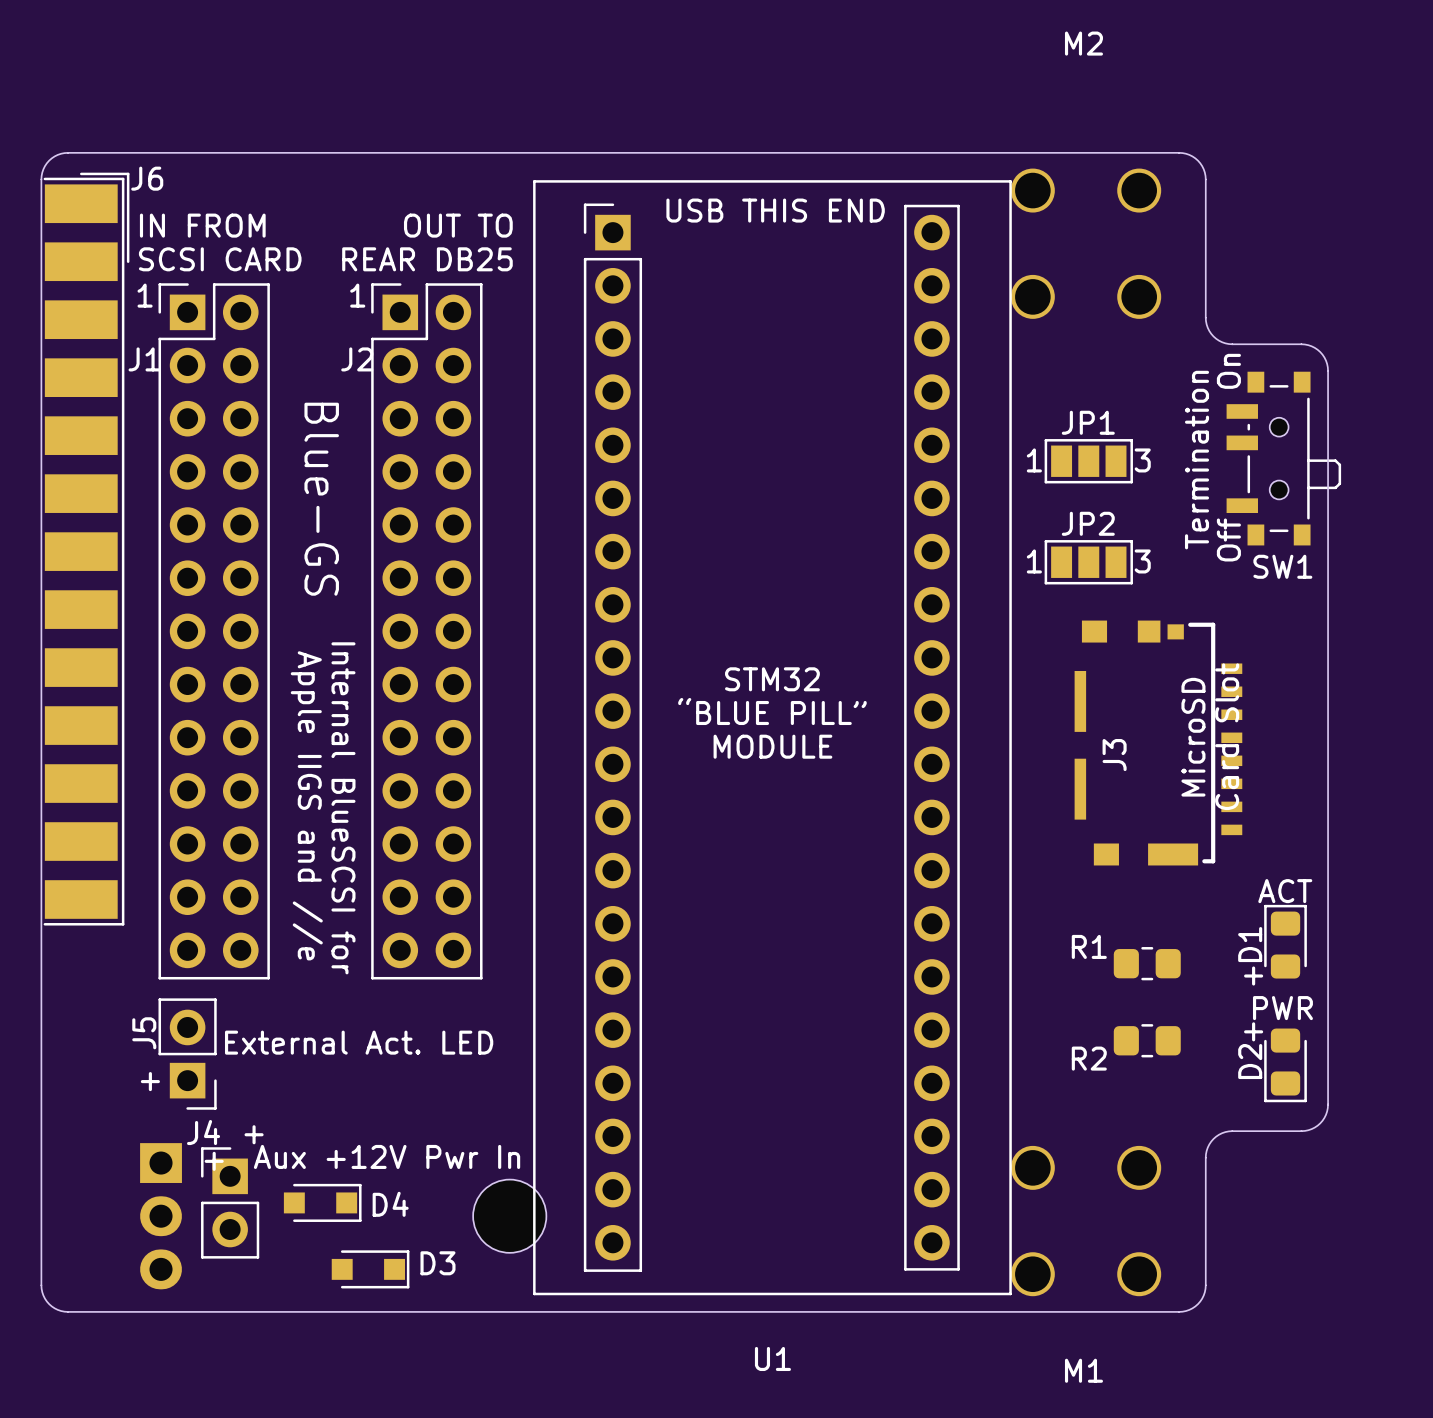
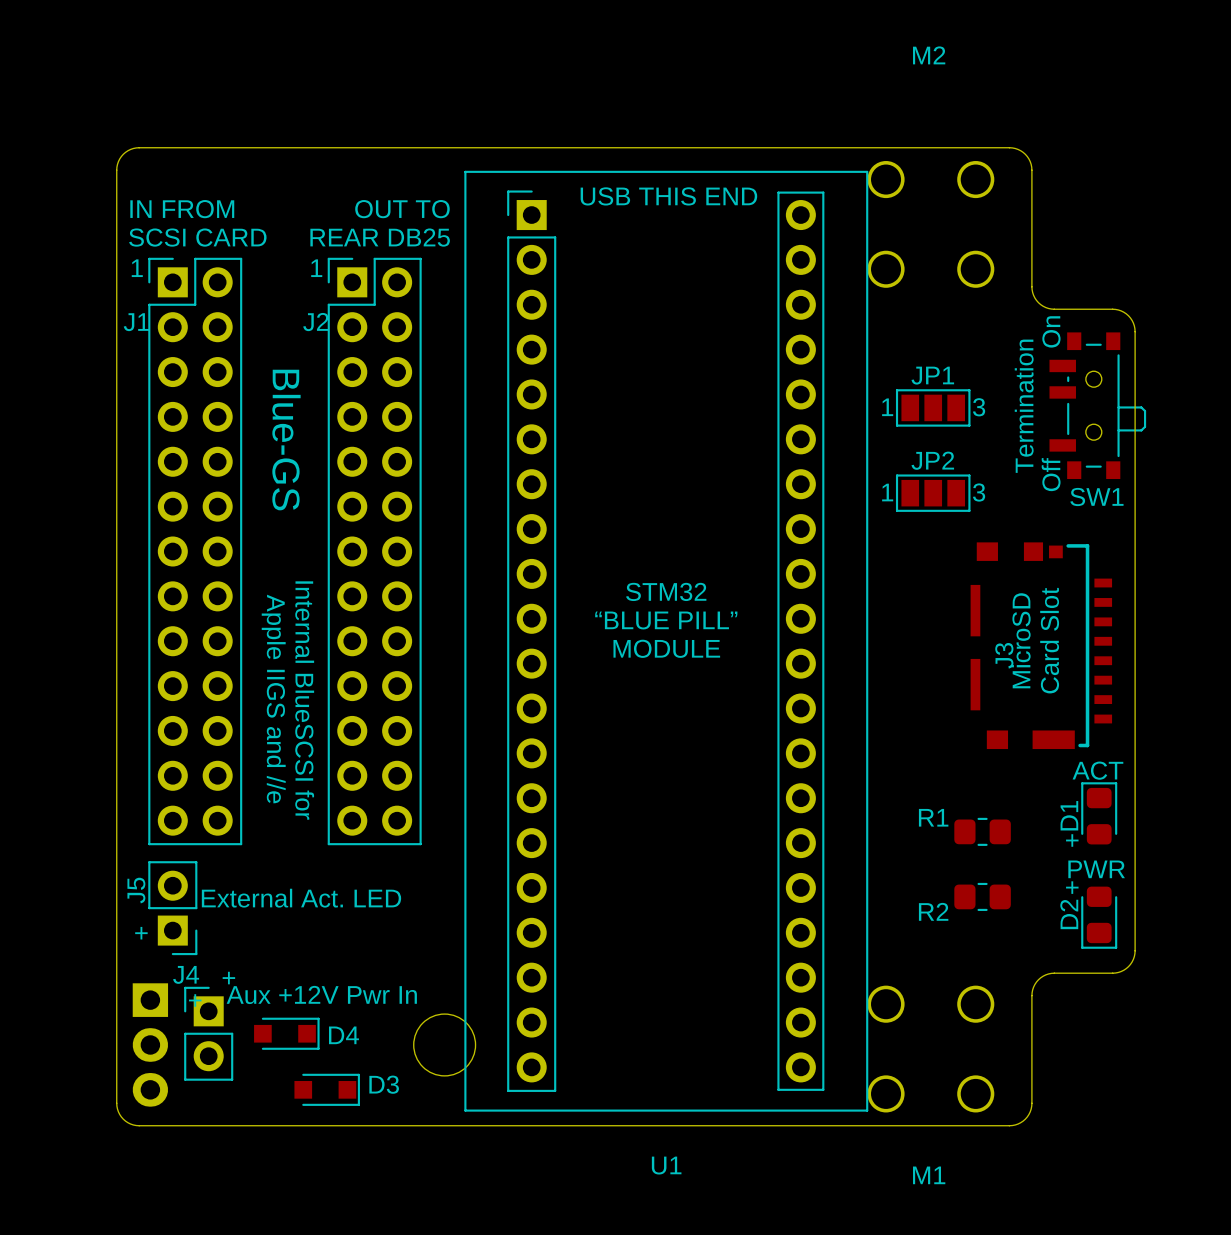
board edge: (147, 152) (61, 153) (46, 163) (41, 179) (41, 1288) (46, 1301) (61, 1311) (147, 1311) -> (139, 147) (130, 149) (123, 154) (118, 161) (116, 170) (116, 1103) (118, 1111) (123, 1119) (130, 1124) (139, 1125)
J6: (86, 549) -> none
J3 position: (1158, 743) -> (1041, 645)

